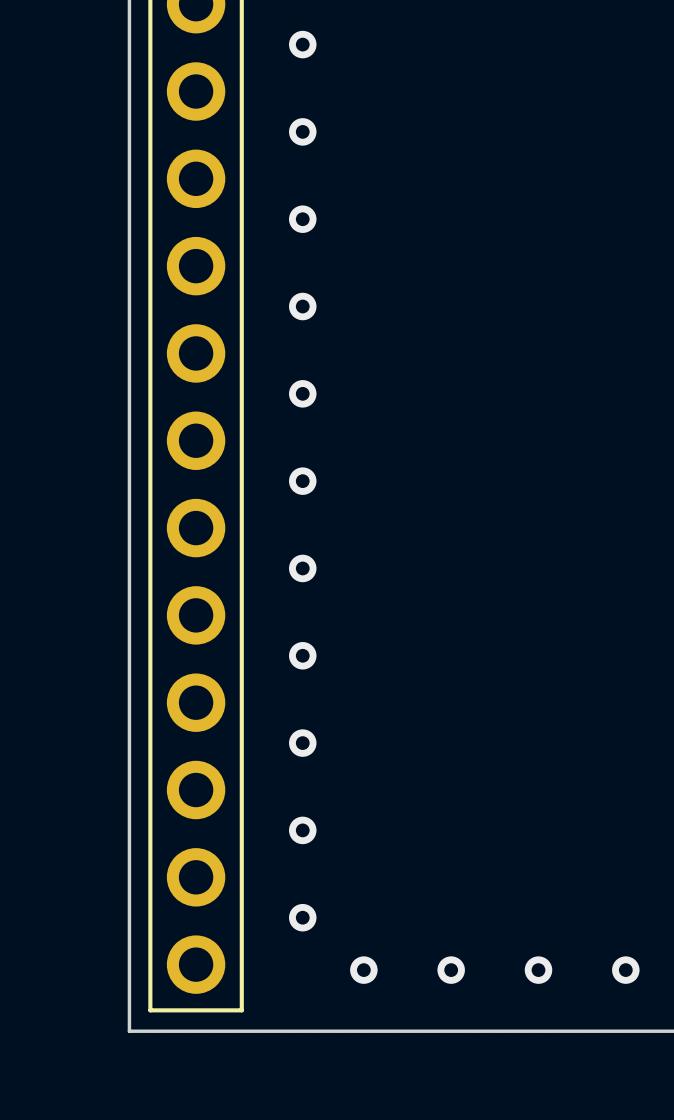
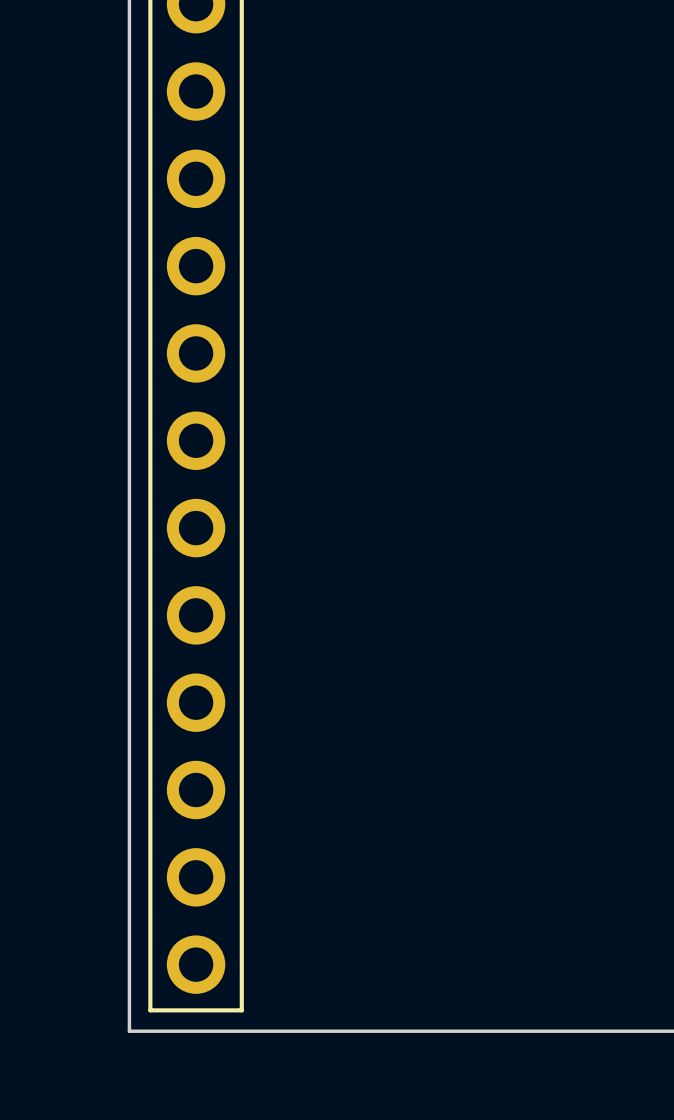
via: (302, 44) -> none
via: (302, 131) -> none
via: (302, 219) -> none
via: (302, 306) -> none
via: (302, 393) -> none
via: (302, 481) -> none
via: (302, 568) -> none
via: (302, 655) -> none
via: (302, 743) -> none
via: (302, 830) -> none
via: (302, 917) -> none
via: (363, 970) -> none
via: (451, 970) -> none
via: (538, 970) -> none
via: (625, 970) -> none

